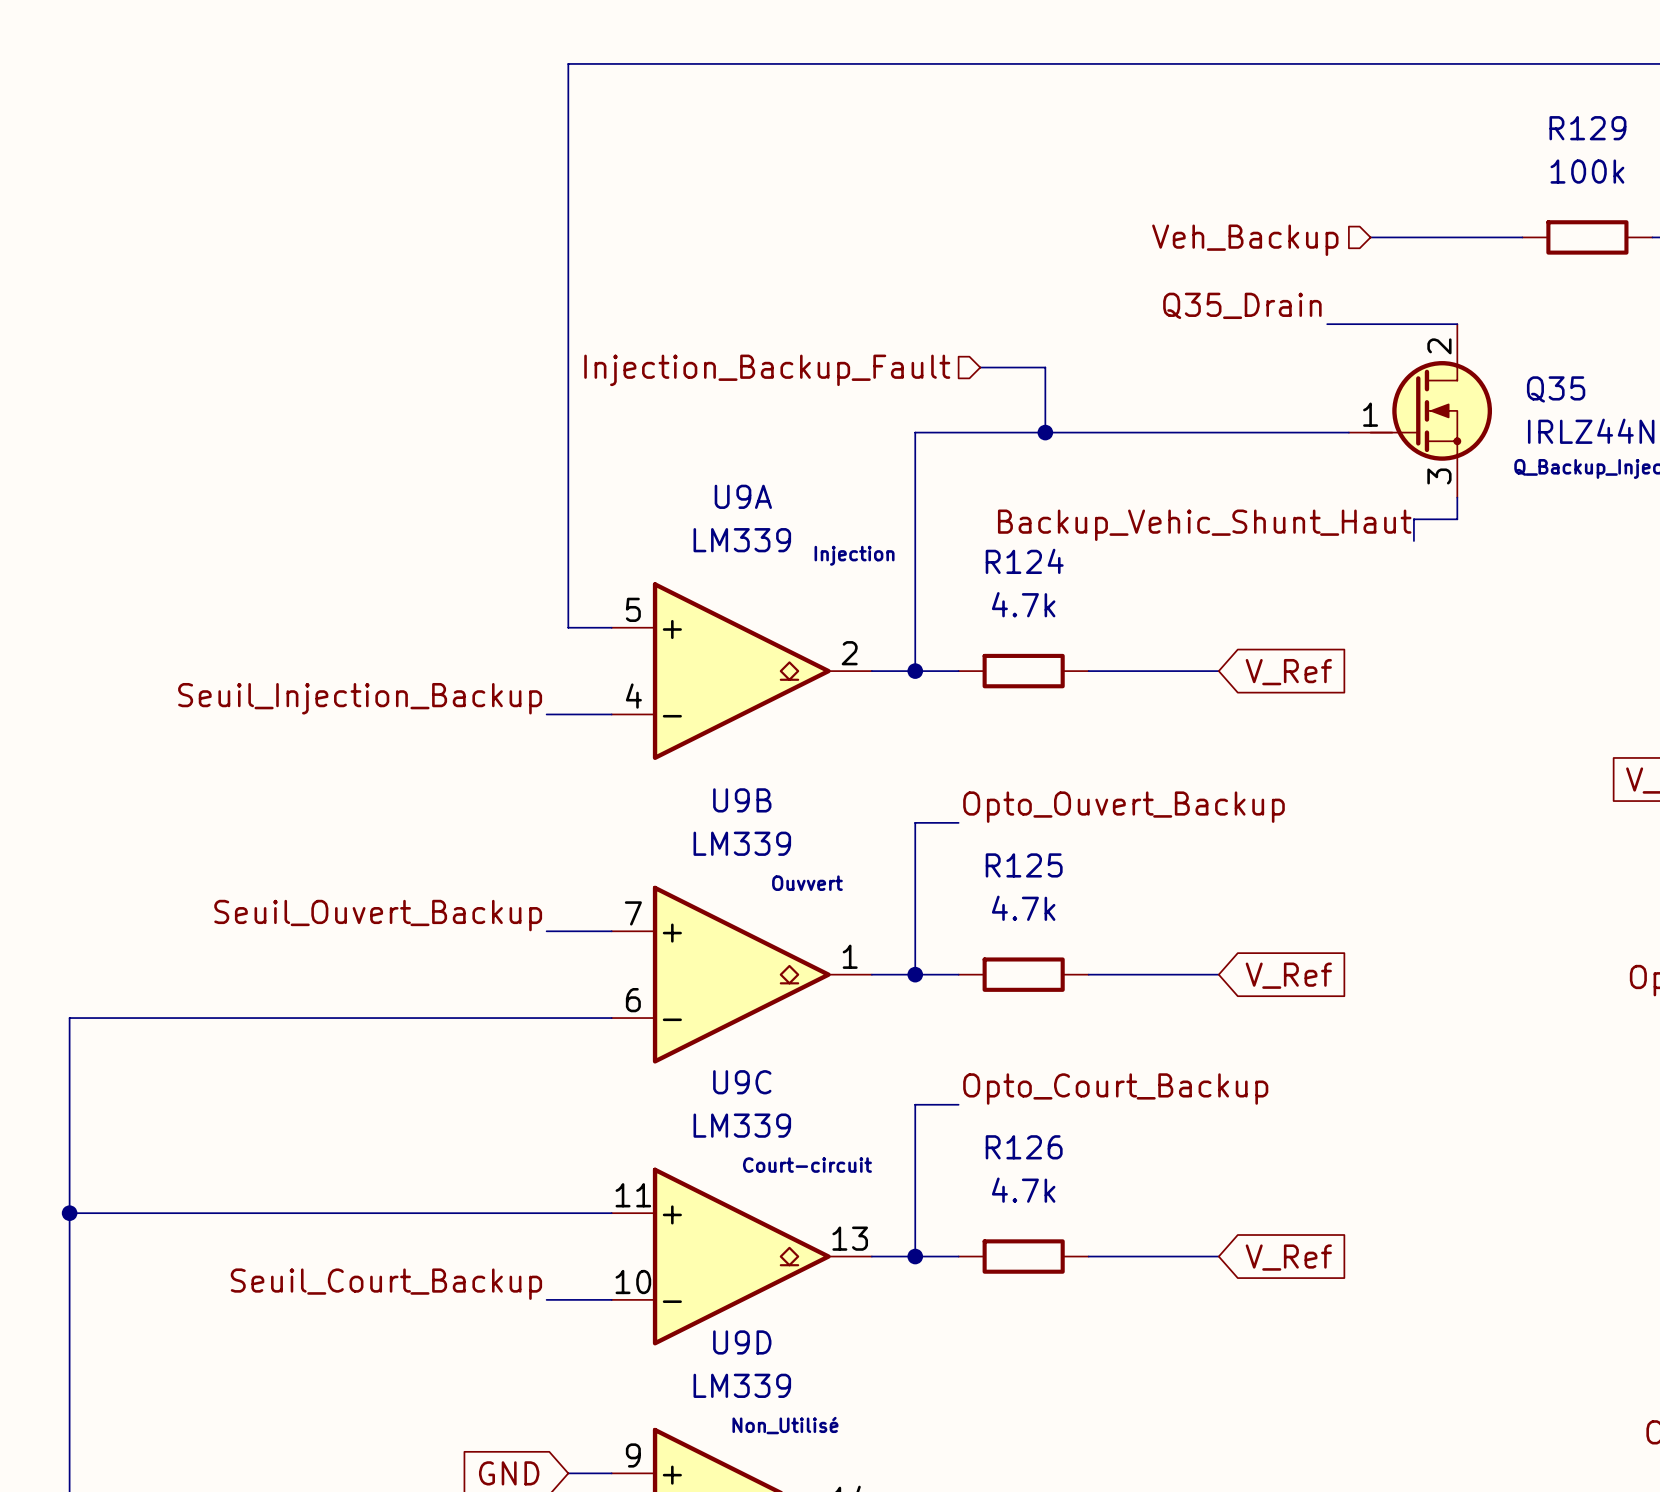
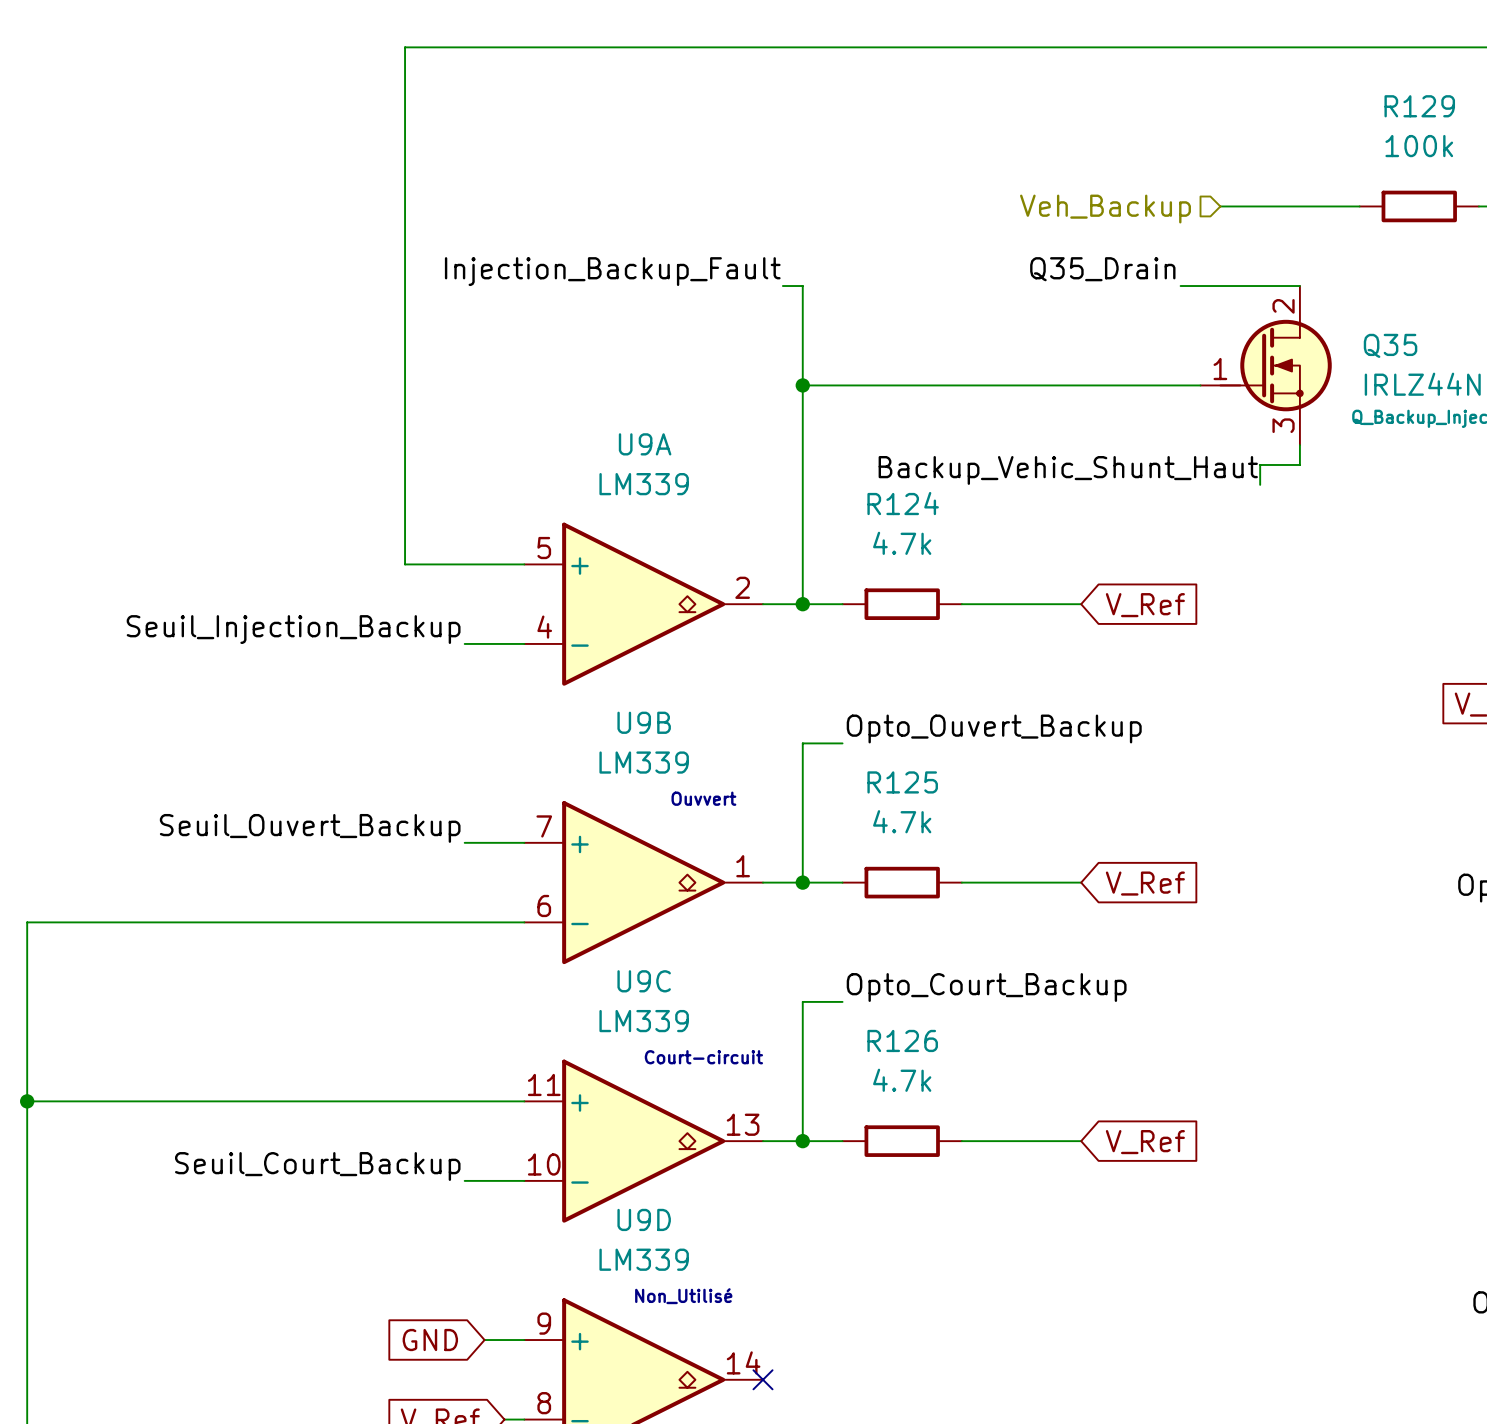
wire: (568, 63) (568, 627) -> (484, 47) (405, 47) (405, 564) (484, 564)
label: none -> Injection_Backup_Fault (612, 271)
wire: none -> (782, 286) (802, 286) (802, 385)
wire: (980, 367) (1045, 367) (1045, 432) -> none
hierarchical label: Injection_Backup_Fault (767, 370) -> none
junction: none -> (802, 385)
junction: (1045, 432) -> none
text: Injection (854, 555) -> none

